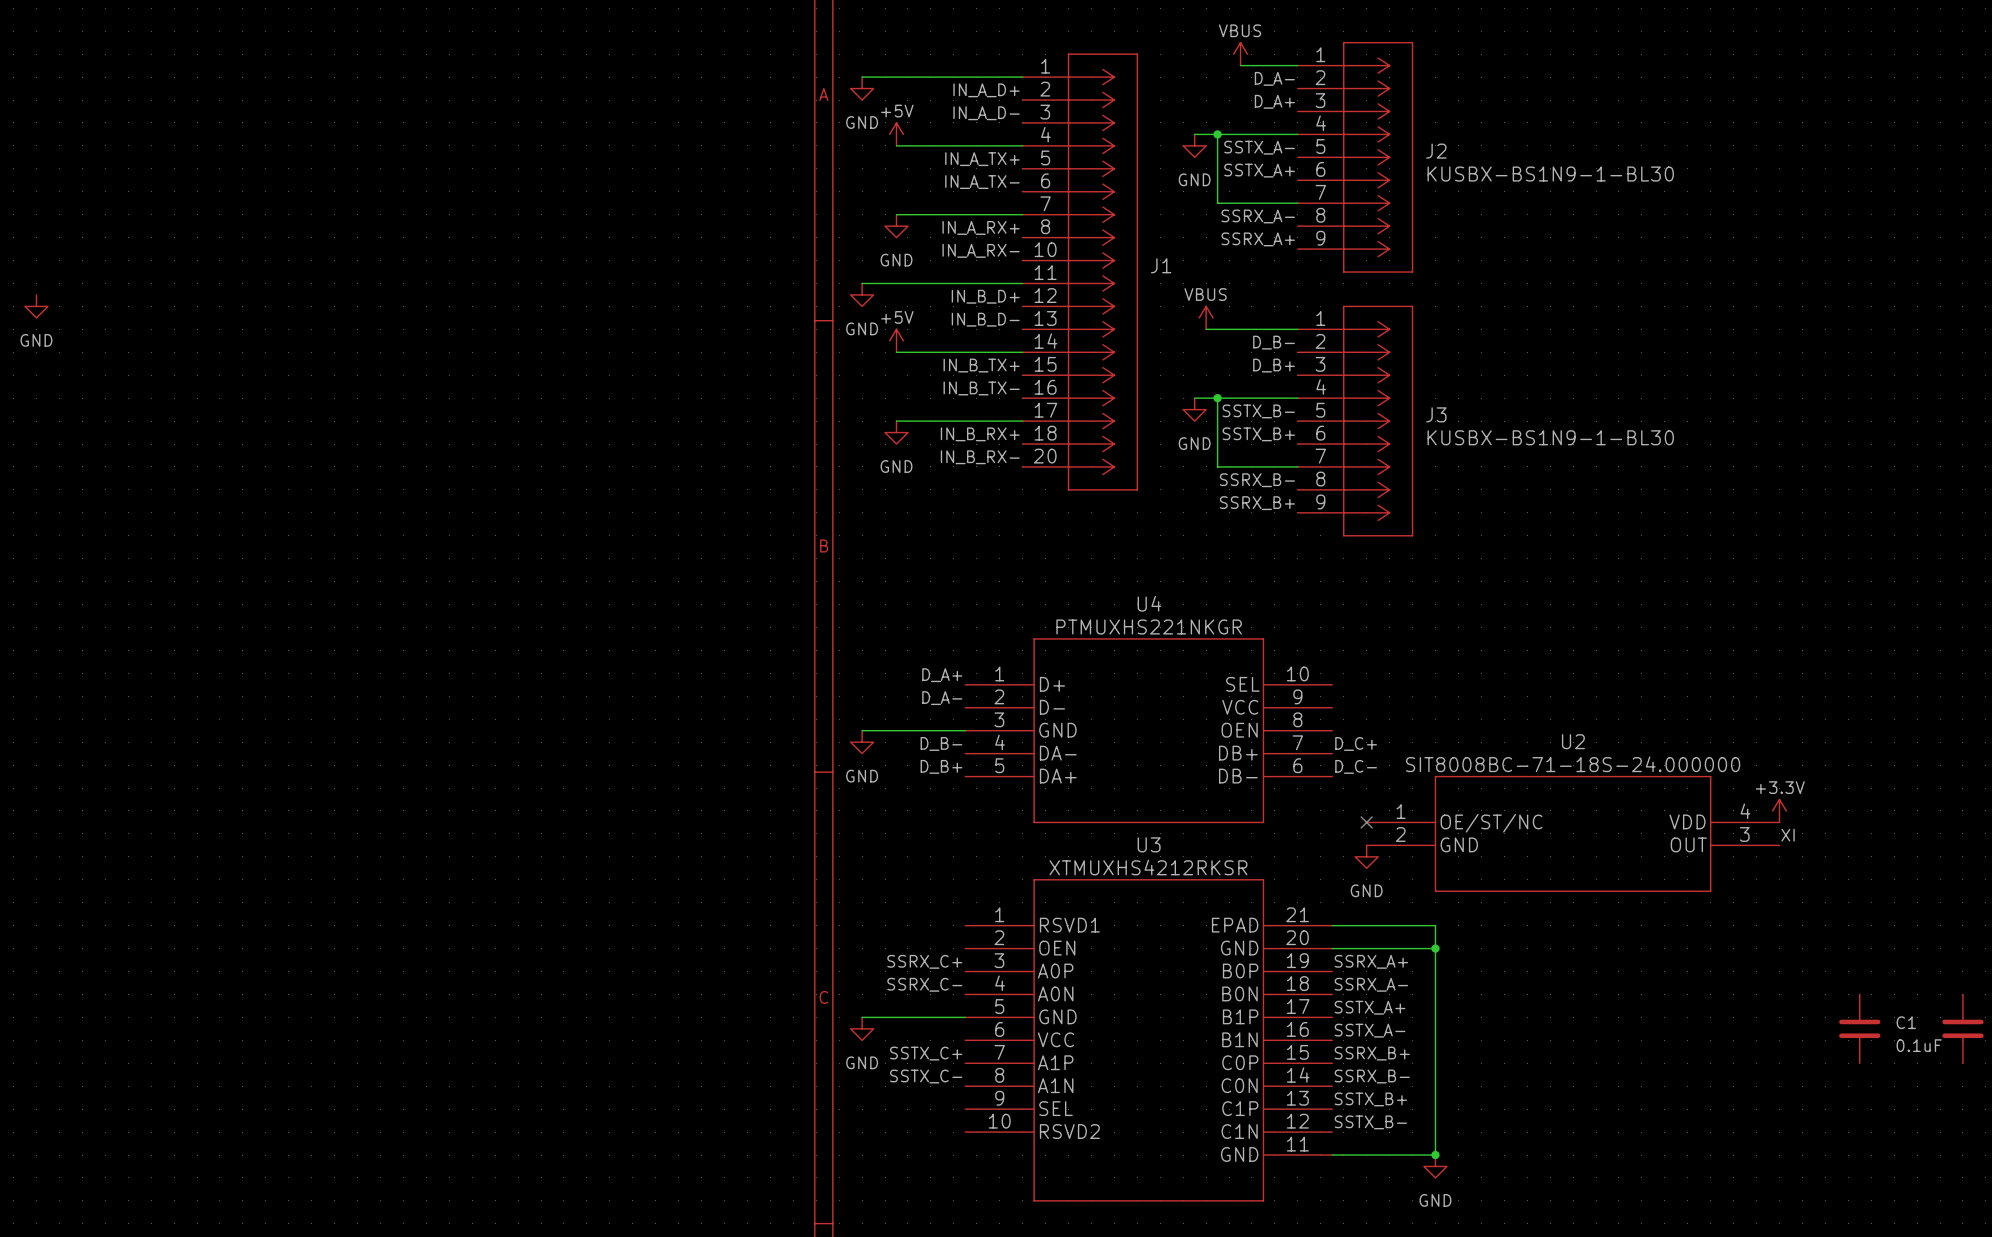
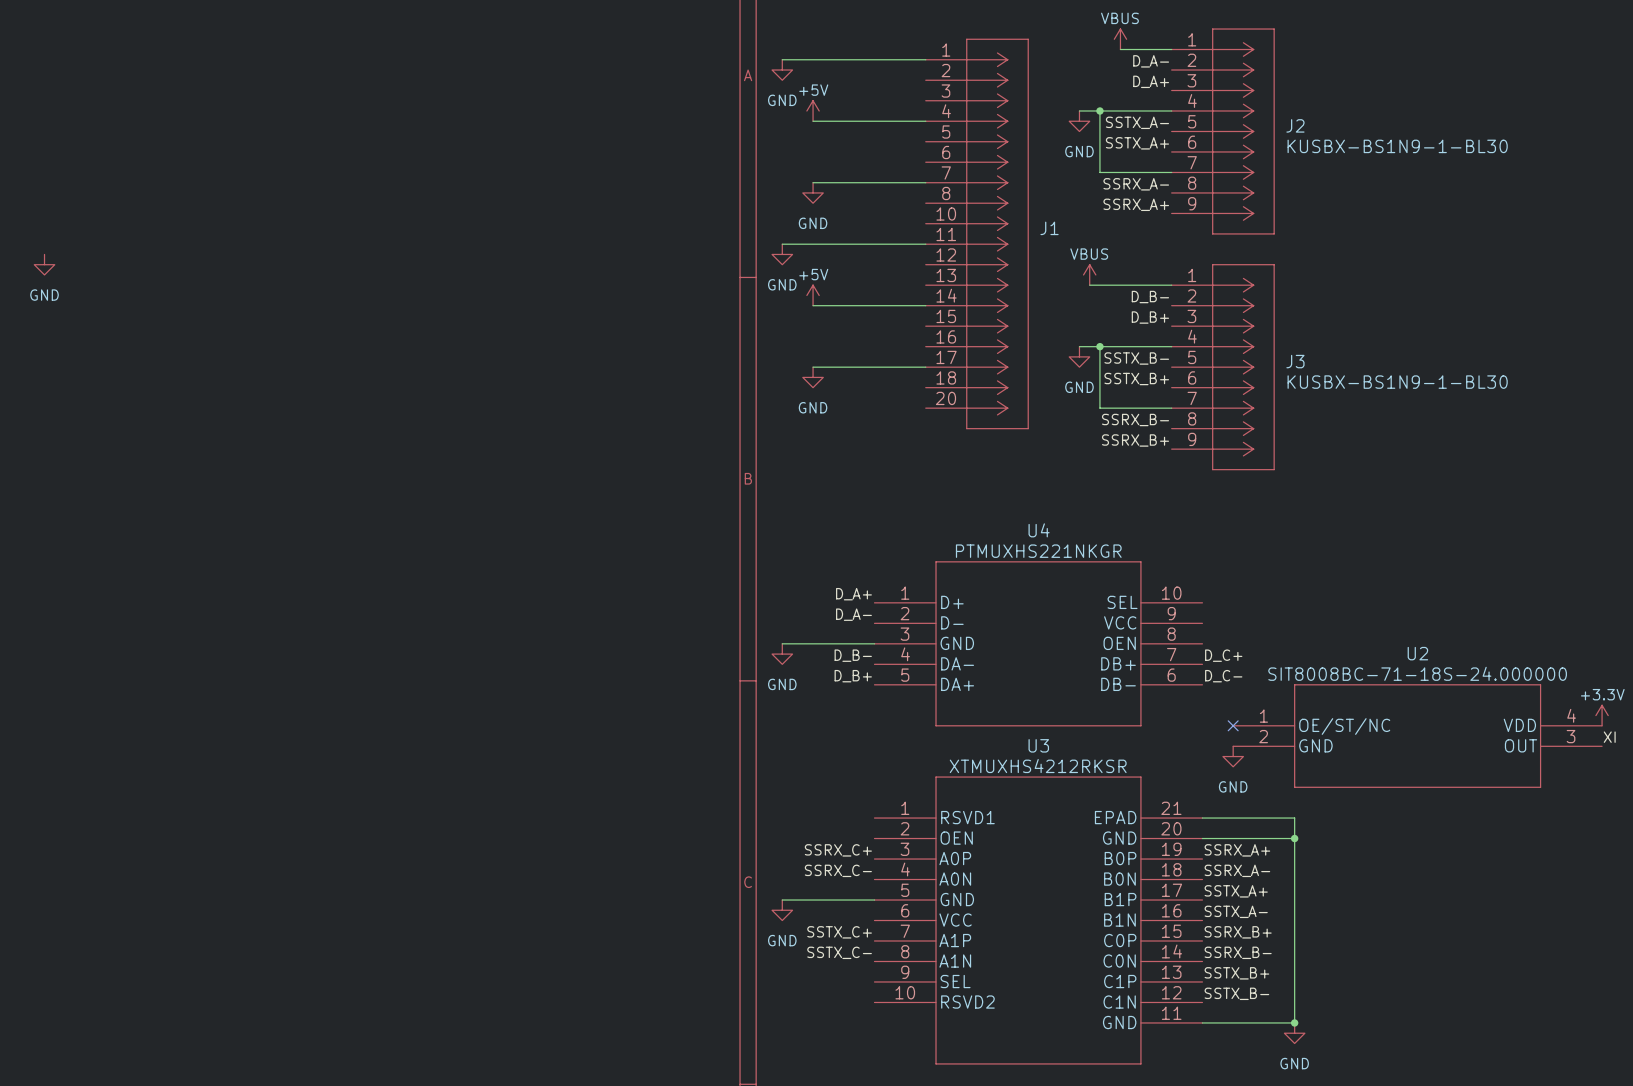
label: IN_A_D+ (986, 90) -> none
label: IN_A_D- (986, 113) -> none
label: IN_A_TX+ (982, 159) -> none
label: IN_A_TX- (982, 182) -> none
label: IN_A_RX+ (981, 227) -> none
label: IN_A_RX- (981, 250) -> none
label: IN_B_D+ (985, 296) -> none
label: IN_B_D- (985, 319) -> none
label: IN_B_TX+ (981, 365) -> none
label: IN_B_TX- (981, 388) -> none
label: IN_B_RX+ (980, 434) -> none
label: IN_B_RX- (980, 457) -> none

